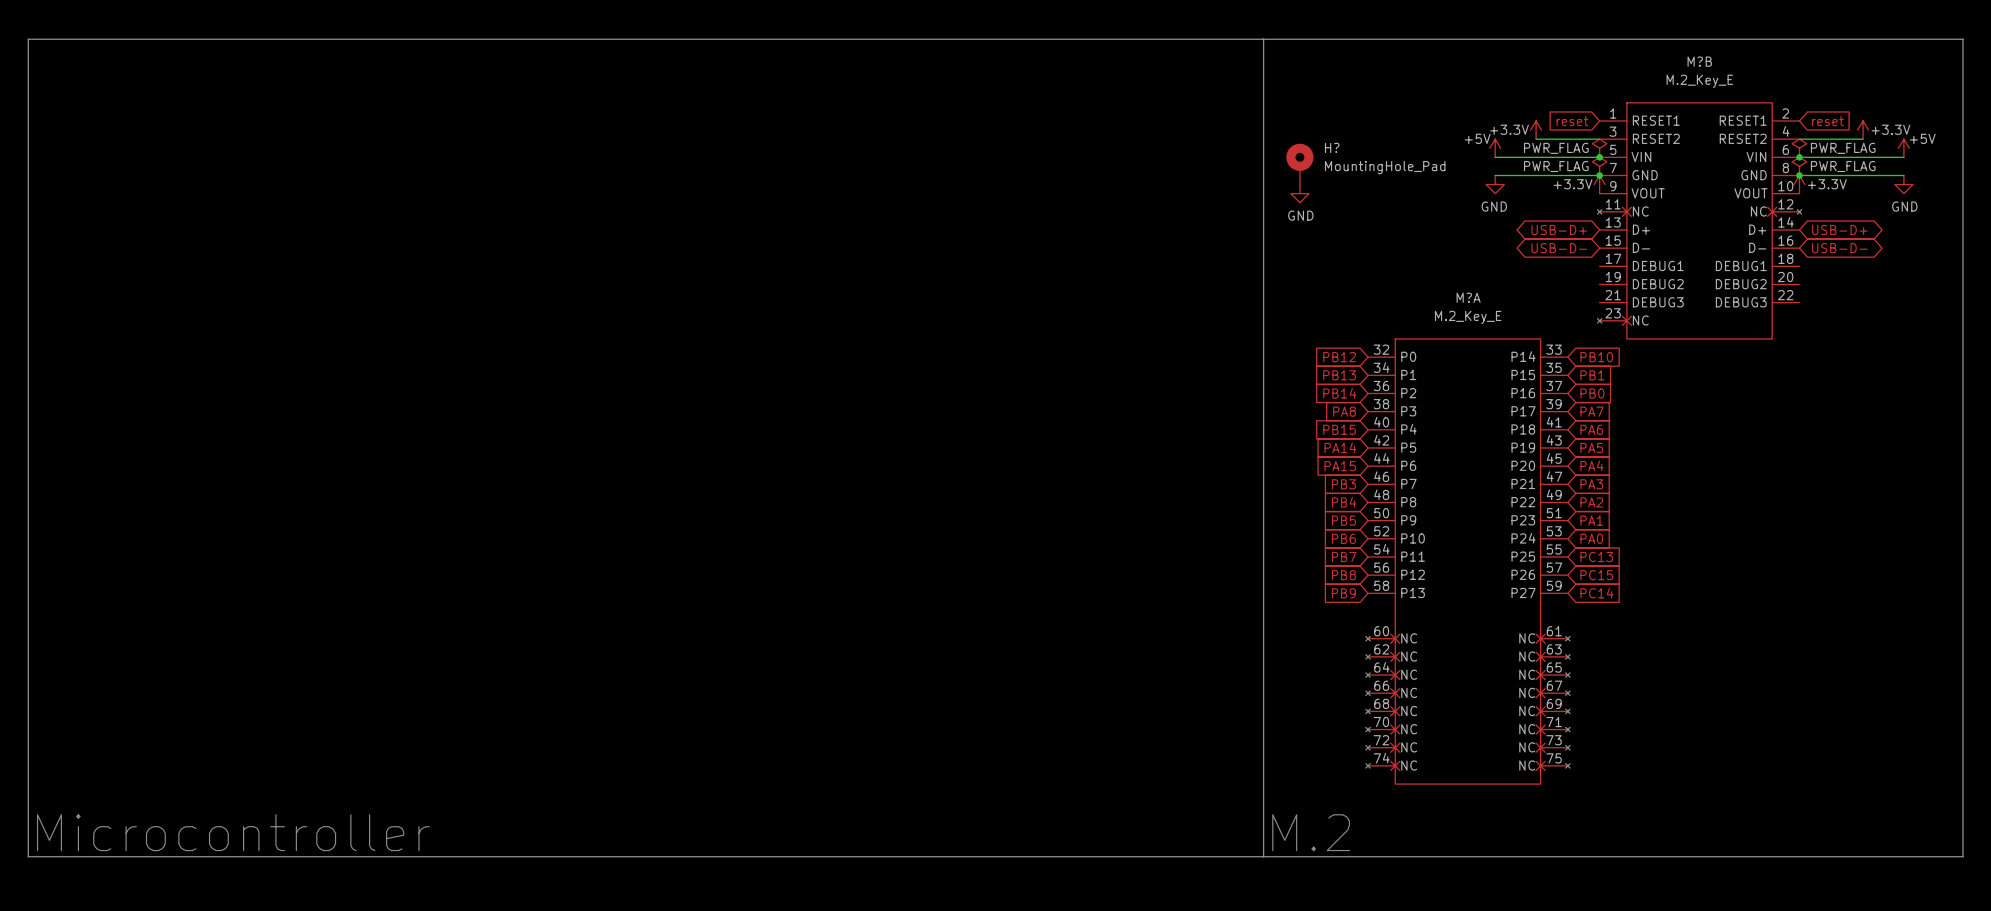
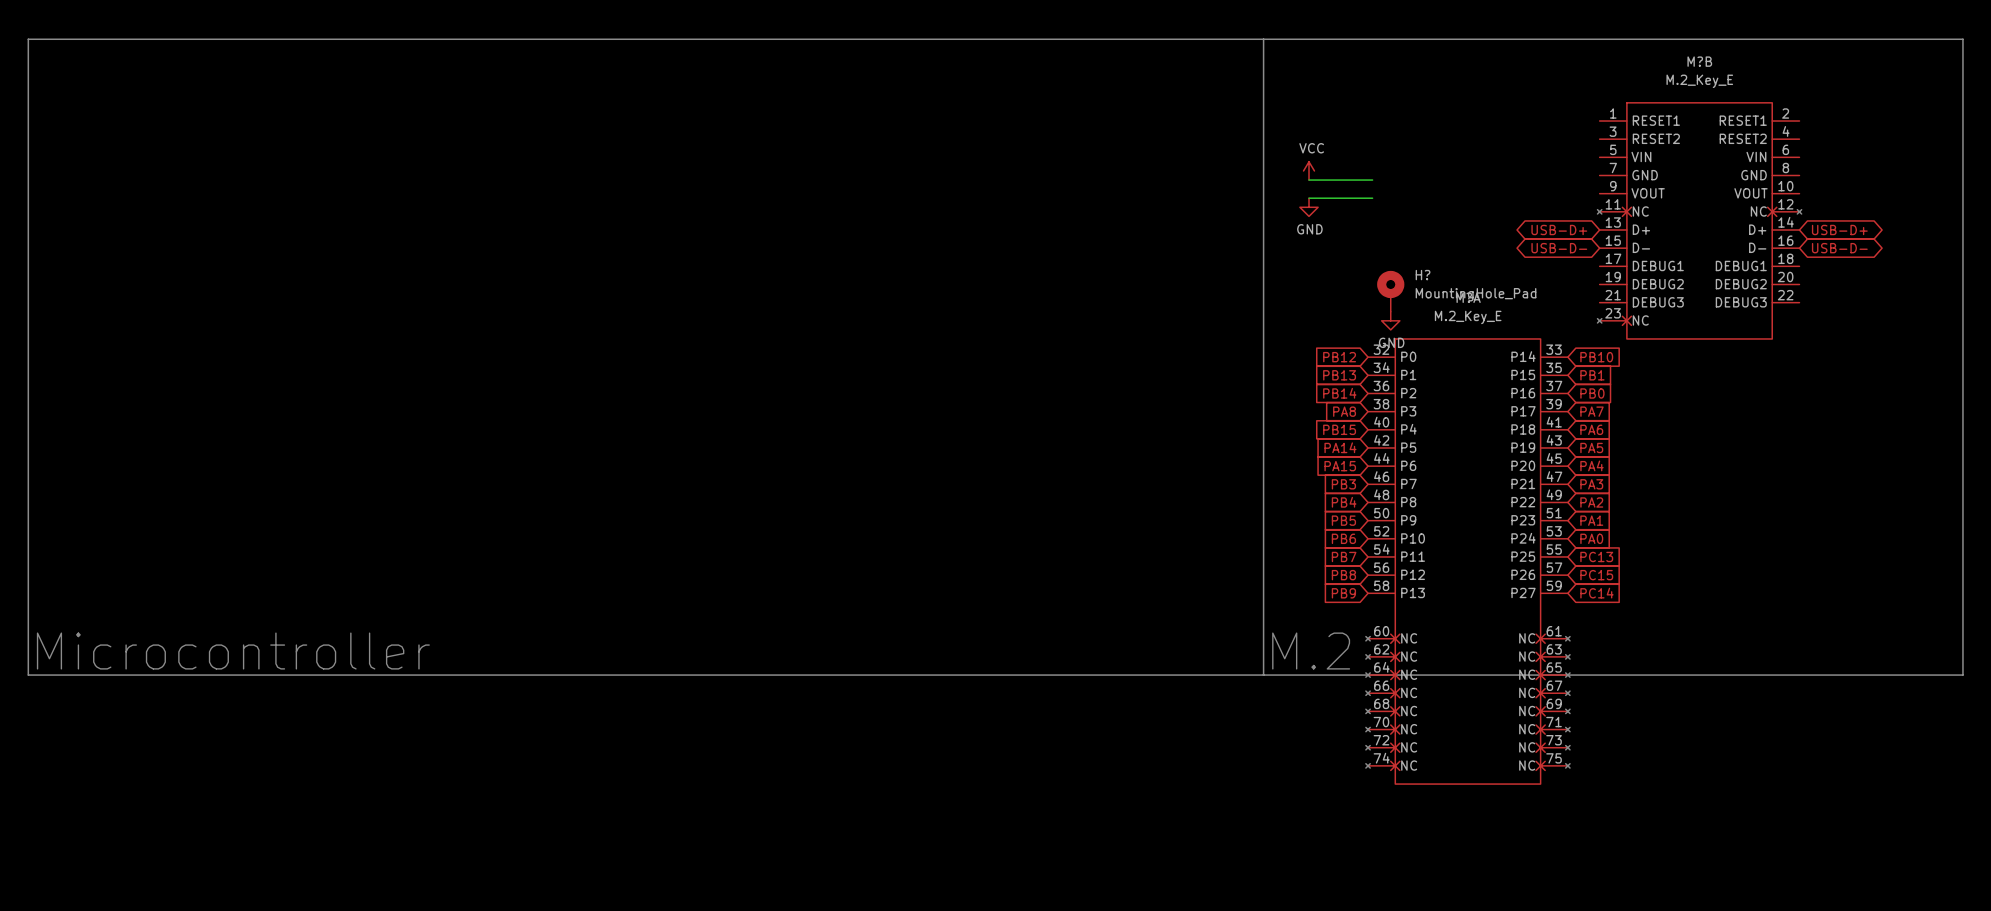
global label: reset (1572, 121) -> none
global label: reset (1827, 121) -> none
power symbol: +3.3V (1536, 130) -> none
power symbol: +3.3V (1863, 130) -> none
wire: (1536, 139) (1599, 139) -> none
wire: (1799, 139) (1863, 139) -> none
power symbol: +5V (1495, 148) -> none
power symbol: PWR_FLAG (1599, 148) -> none
power symbol: PWR_FLAG (1799, 148) -> none
power symbol: +5V (1903, 148) -> none
wire: (1495, 157) (1599, 157) -> none
junction: (1599, 157) -> none
wire: (1799, 157) (1903, 157) -> none
junction: (1799, 157) -> none
H? position: (1299, 164) -> (1390, 291)
power symbol: PWR_FLAG (1599, 166) -> none
power symbol: PWR_FLAG (1799, 166) -> none
power symbol: none -> VCC (1309, 170)
wire: (1495, 175) (1599, 175) -> none
junction: (1599, 175) -> none
wire: (1799, 175) (1903, 175) -> none
junction: (1799, 175) -> none
wire: none -> (1309, 180) (1372, 180)
power symbol: GND (1495, 184) -> none
power symbol: +3.3V (1599, 184) -> none
power symbol: +3.3V (1799, 184) -> none
power symbol: GND (1903, 184) -> none
power symbol position: GND (1299, 193) -> GND (1309, 207)
wire: none -> (1309, 198) (1372, 198)
power symbol: none -> GND (1390, 320)
text: none -> Microcontroller (233, 651)
text: none -> M.2 (1311, 651)
line: (28, 675) (28, 856) (1962, 856) (1962, 675) -> (28, 675) (1962, 675)
line: (1263, 675) (1263, 856) -> none
text: Microcontroller (233, 832) -> none
text: M.2 (1311, 832) -> none

